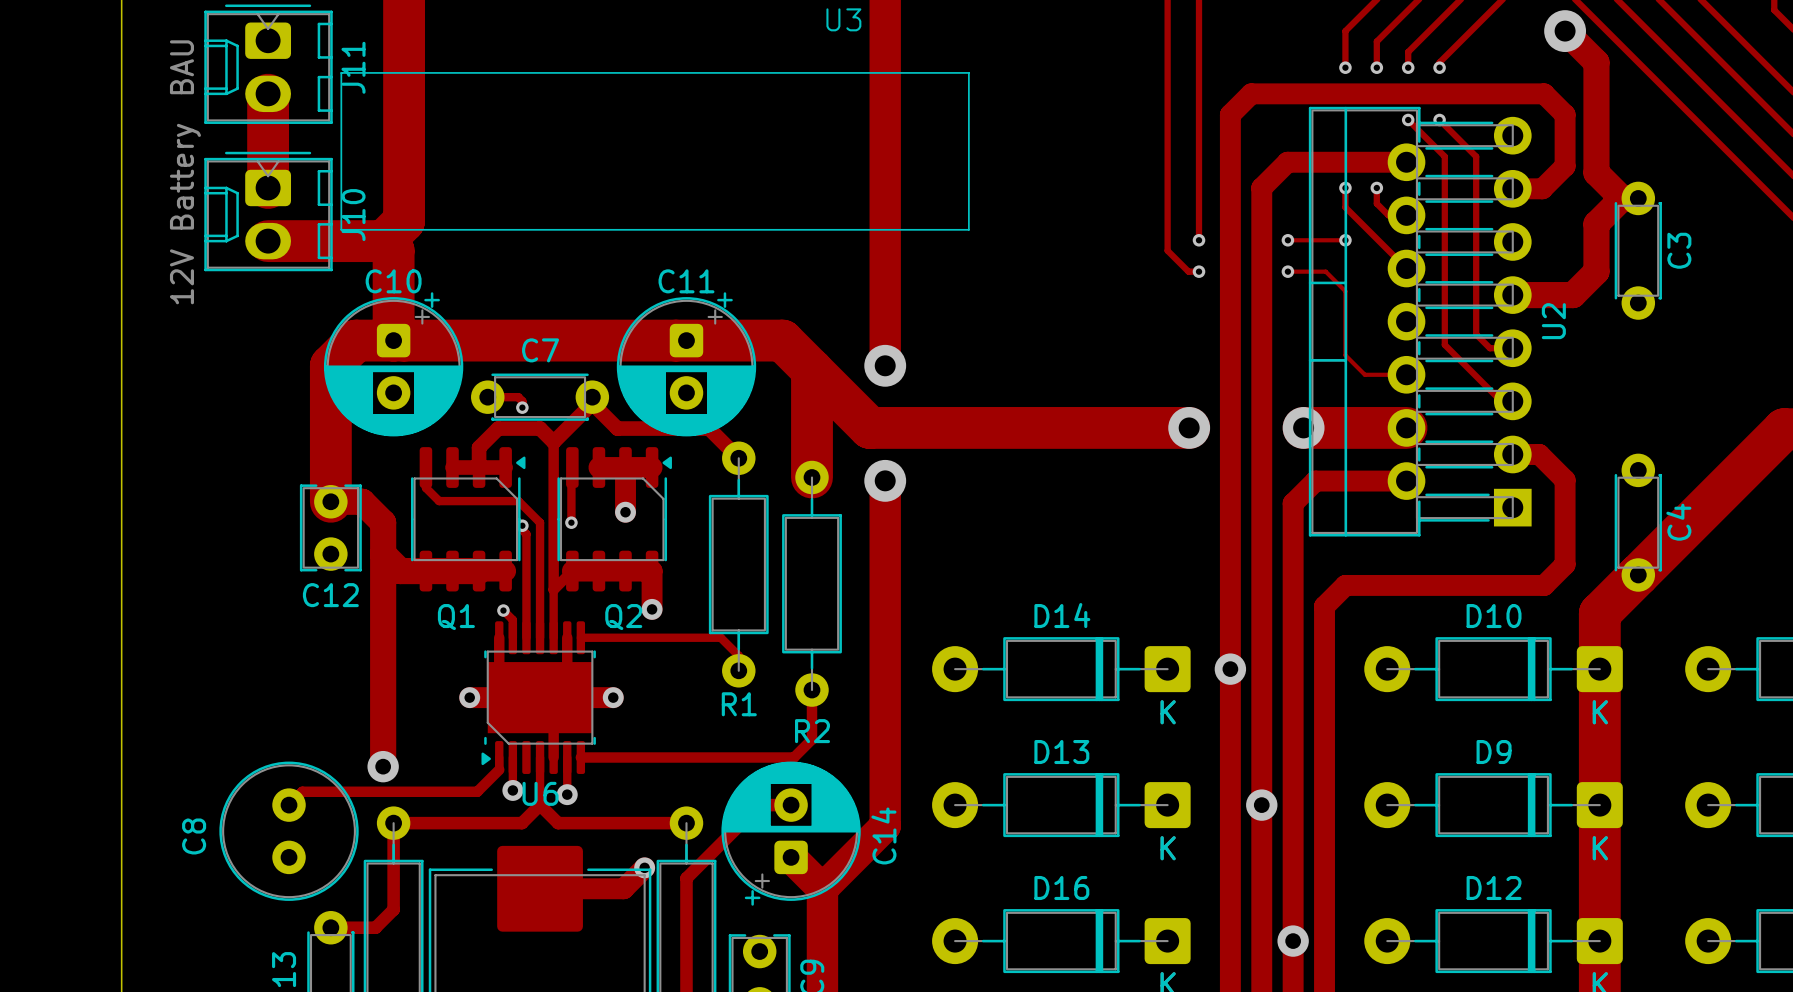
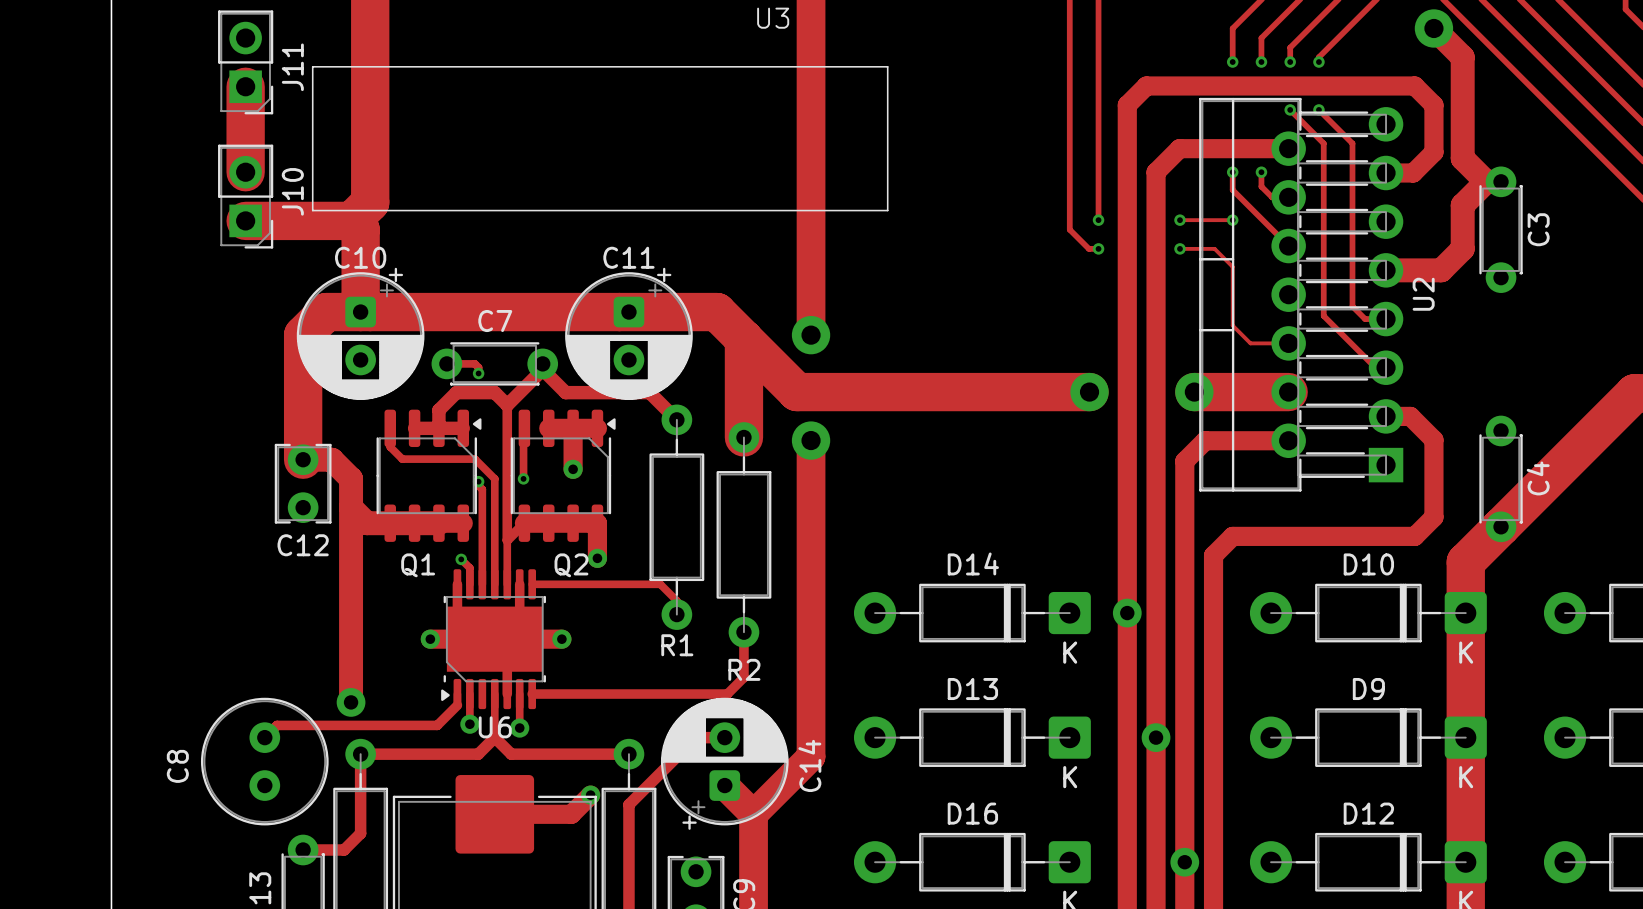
J11 footprint: [204, 4, 333, 124] -> [218, 10, 274, 115]
J11 value: BAU (181, 67) -> none
J10 footprint: [204, 151, 333, 272] -> [218, 144, 274, 249]
J10 value: 12V Battery (185, 214) -> none

